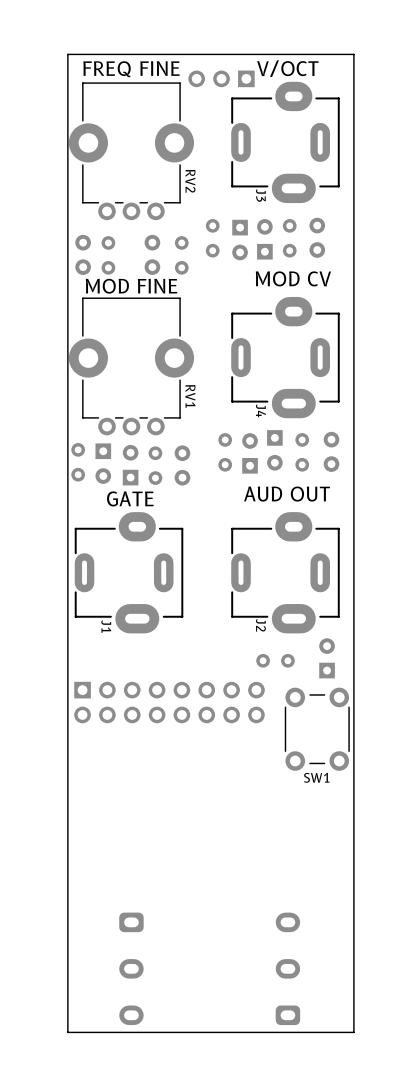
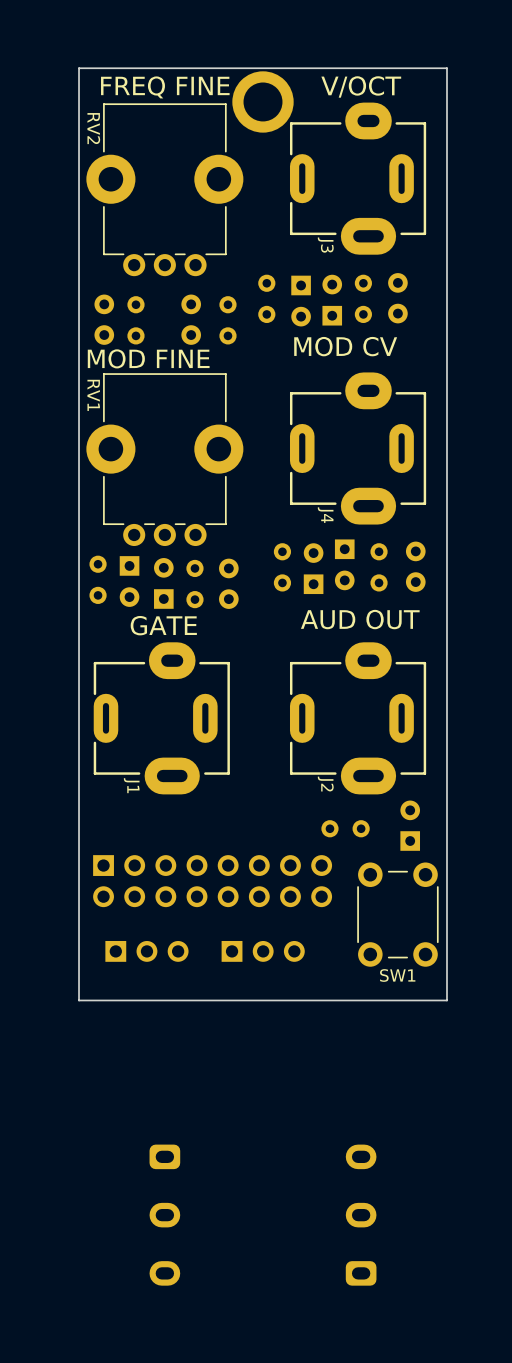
board edge: (353, 54) (353, 1032) (67, 1032) (67, 54) -> (443, 68) (446, 68) (446, 1000) (79, 1000) (79, 68) (85, 68)
part: (221, 78) -> none
part: none -> (263, 101)
RV2 name position: RV2 (190, 181) -> RV2 (93, 128)
text position: MOD CV (293, 278) -> MOD CV (345, 346)
text position: MOD FINE (131, 286) -> MOD FINE (148, 358)
RV1 name position: RV1 (190, 396) -> RV1 (93, 395)
part: none -> (146, 951)
part: none -> (263, 951)

